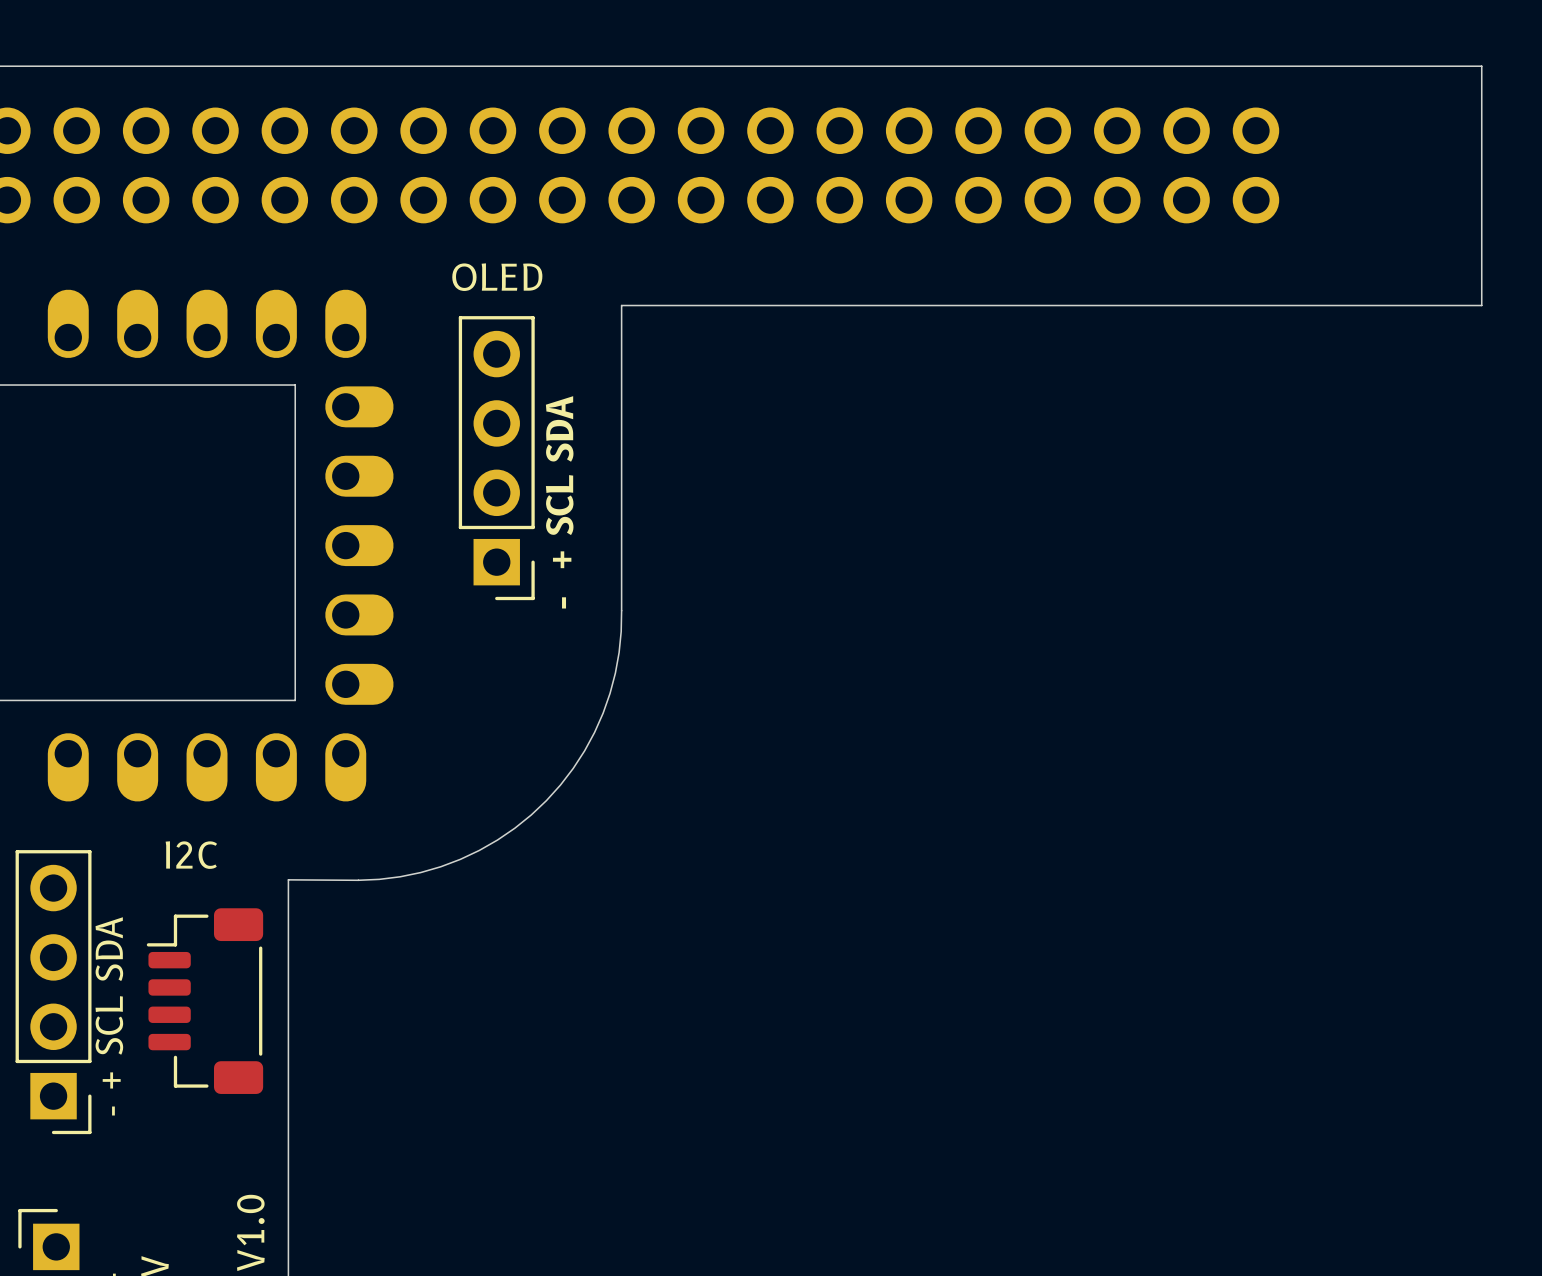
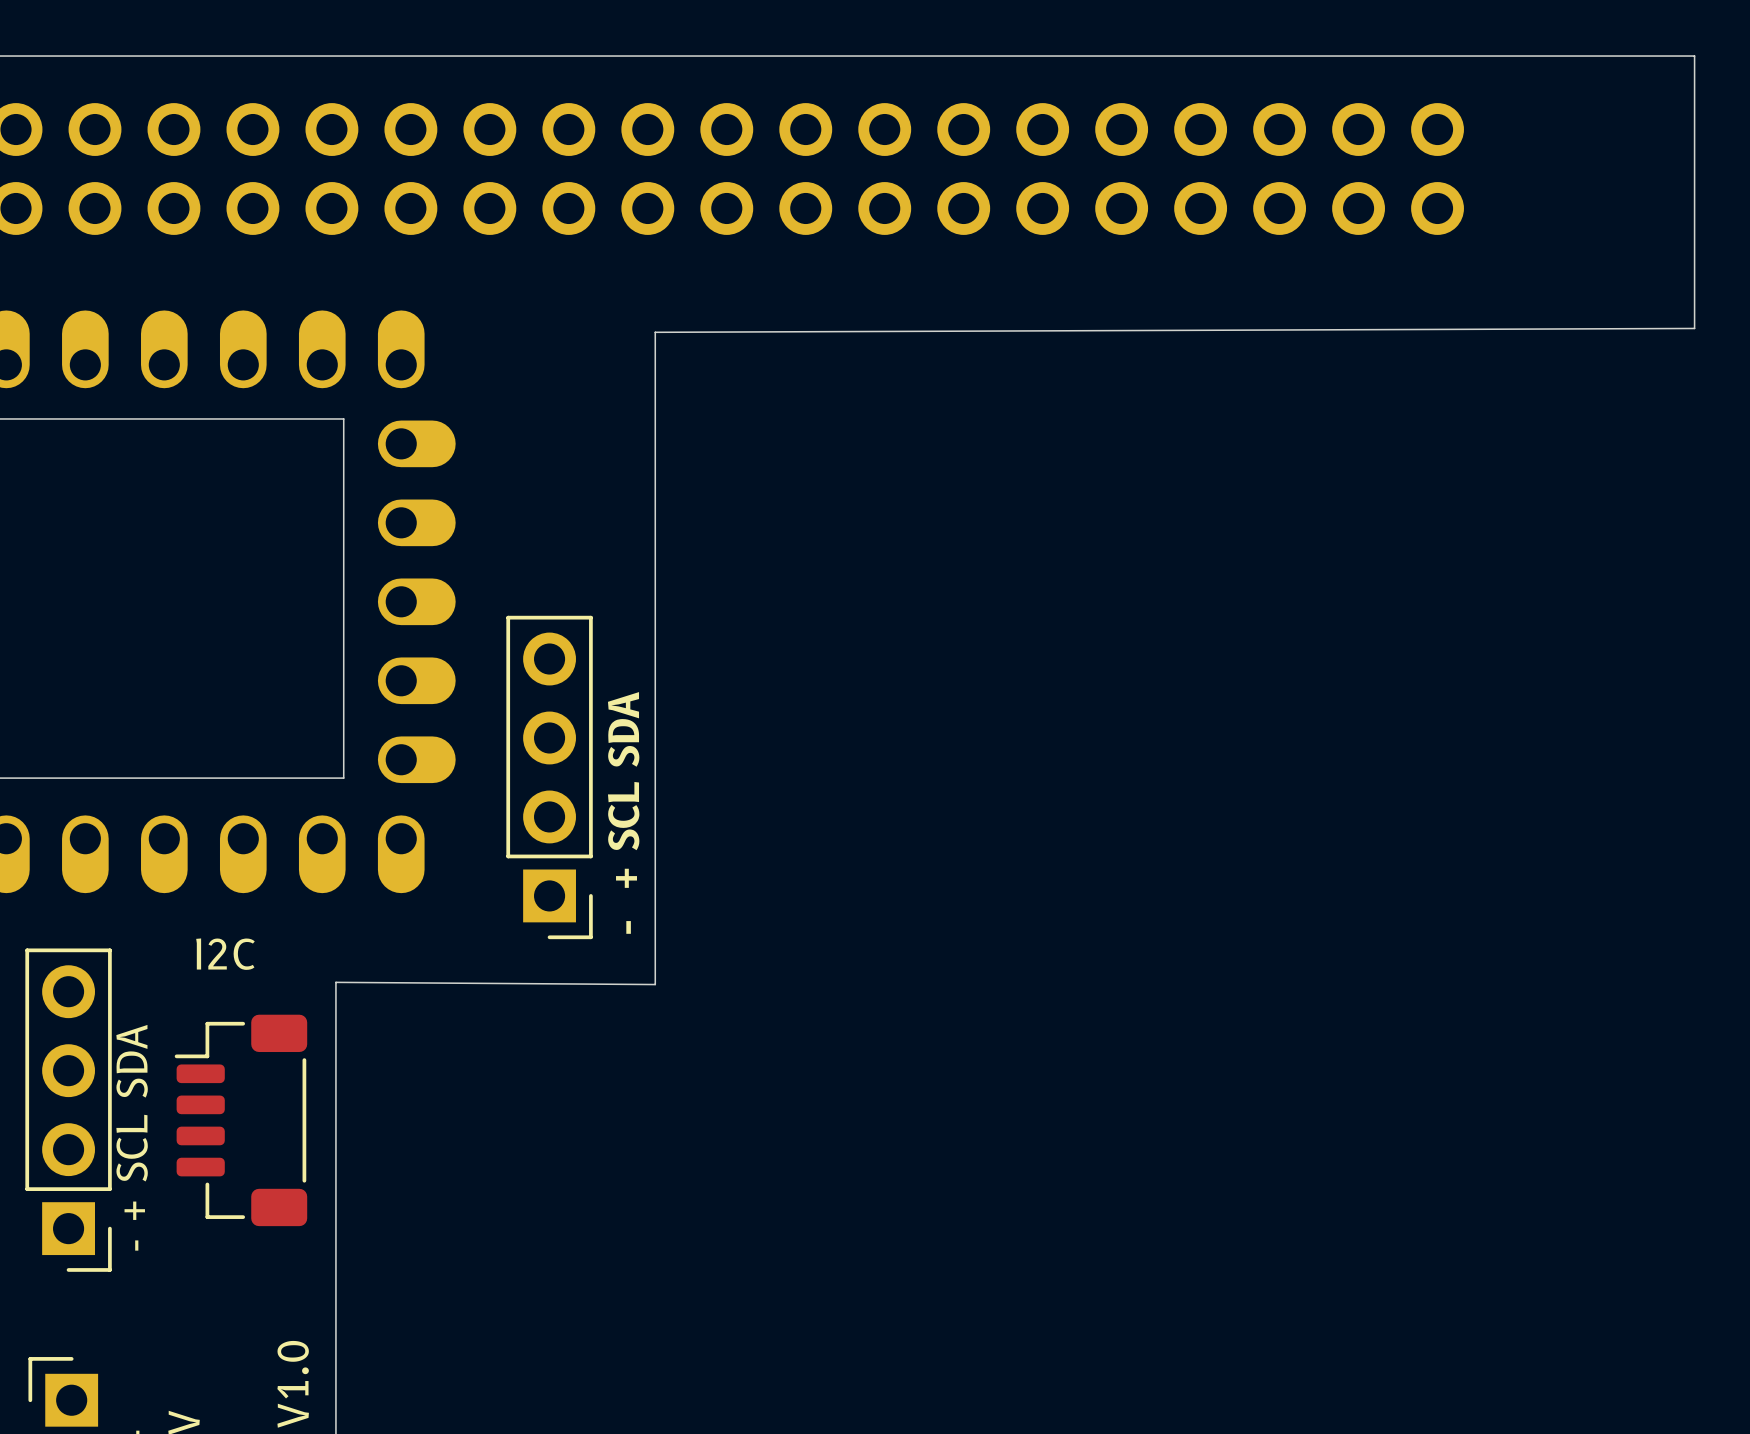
board edge: (1481, 305) (621, 305) (621, 631) (615, 673) (610, 693) (603, 713) (584, 750) (560, 785) (531, 815) (497, 839) (460, 859) (420, 872) (379, 879) (288, 879) -> (1694, 328) (655, 332) (655, 984) (335, 982)
OLED: (496, 458) -> none
text position: - + SCL SDA (559, 502) -> - + SCL SDA (623, 812)
part: none -> (549, 777)

